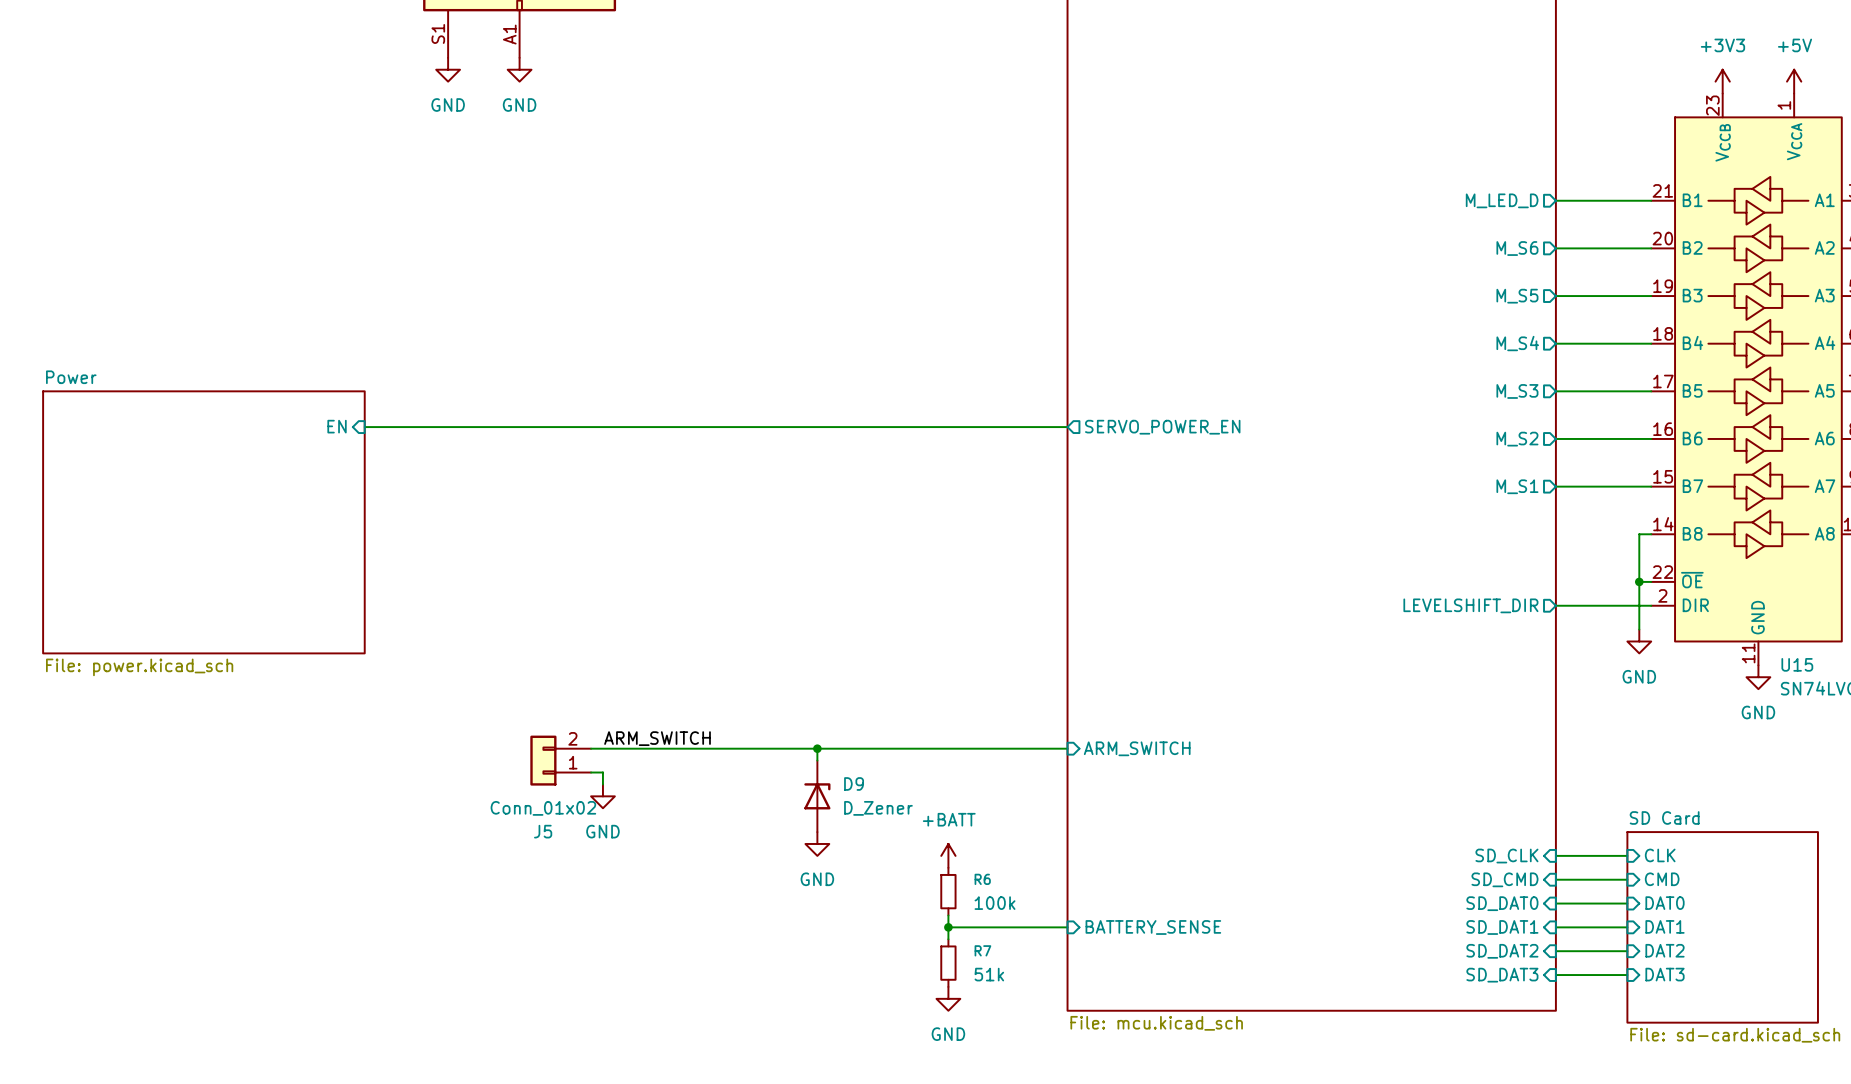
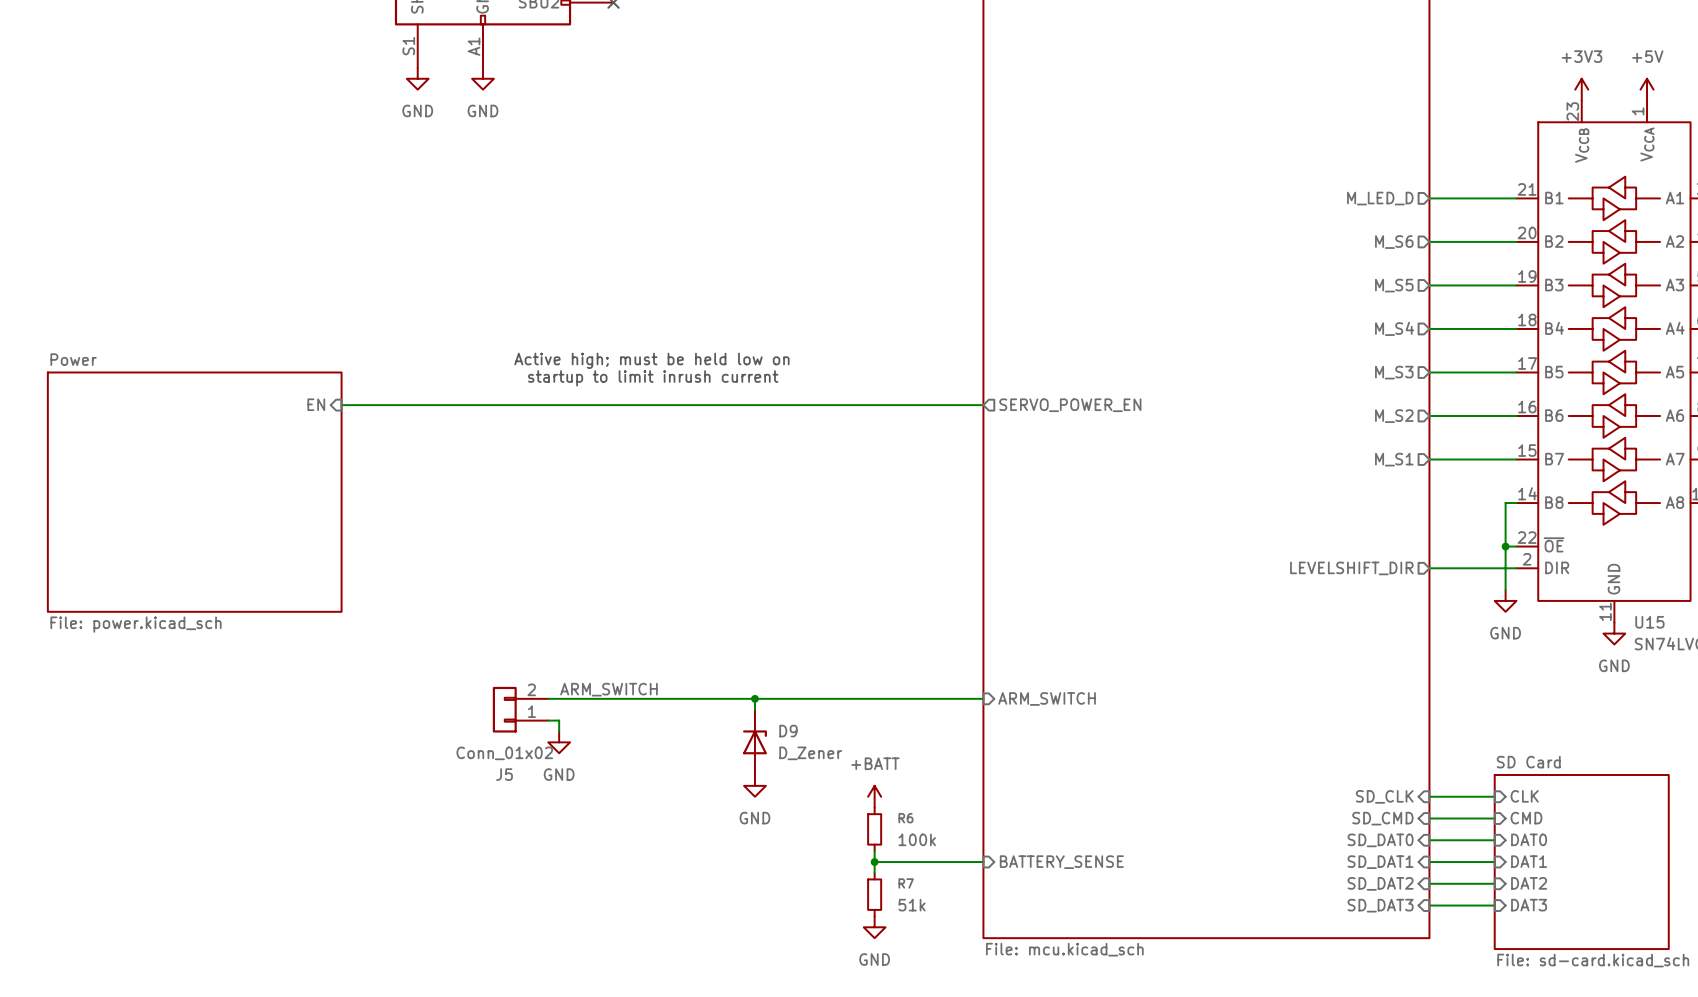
text: none -> Active high; must be held low on (651, 360)
text: none -> startup to limit inrush current (653, 378)

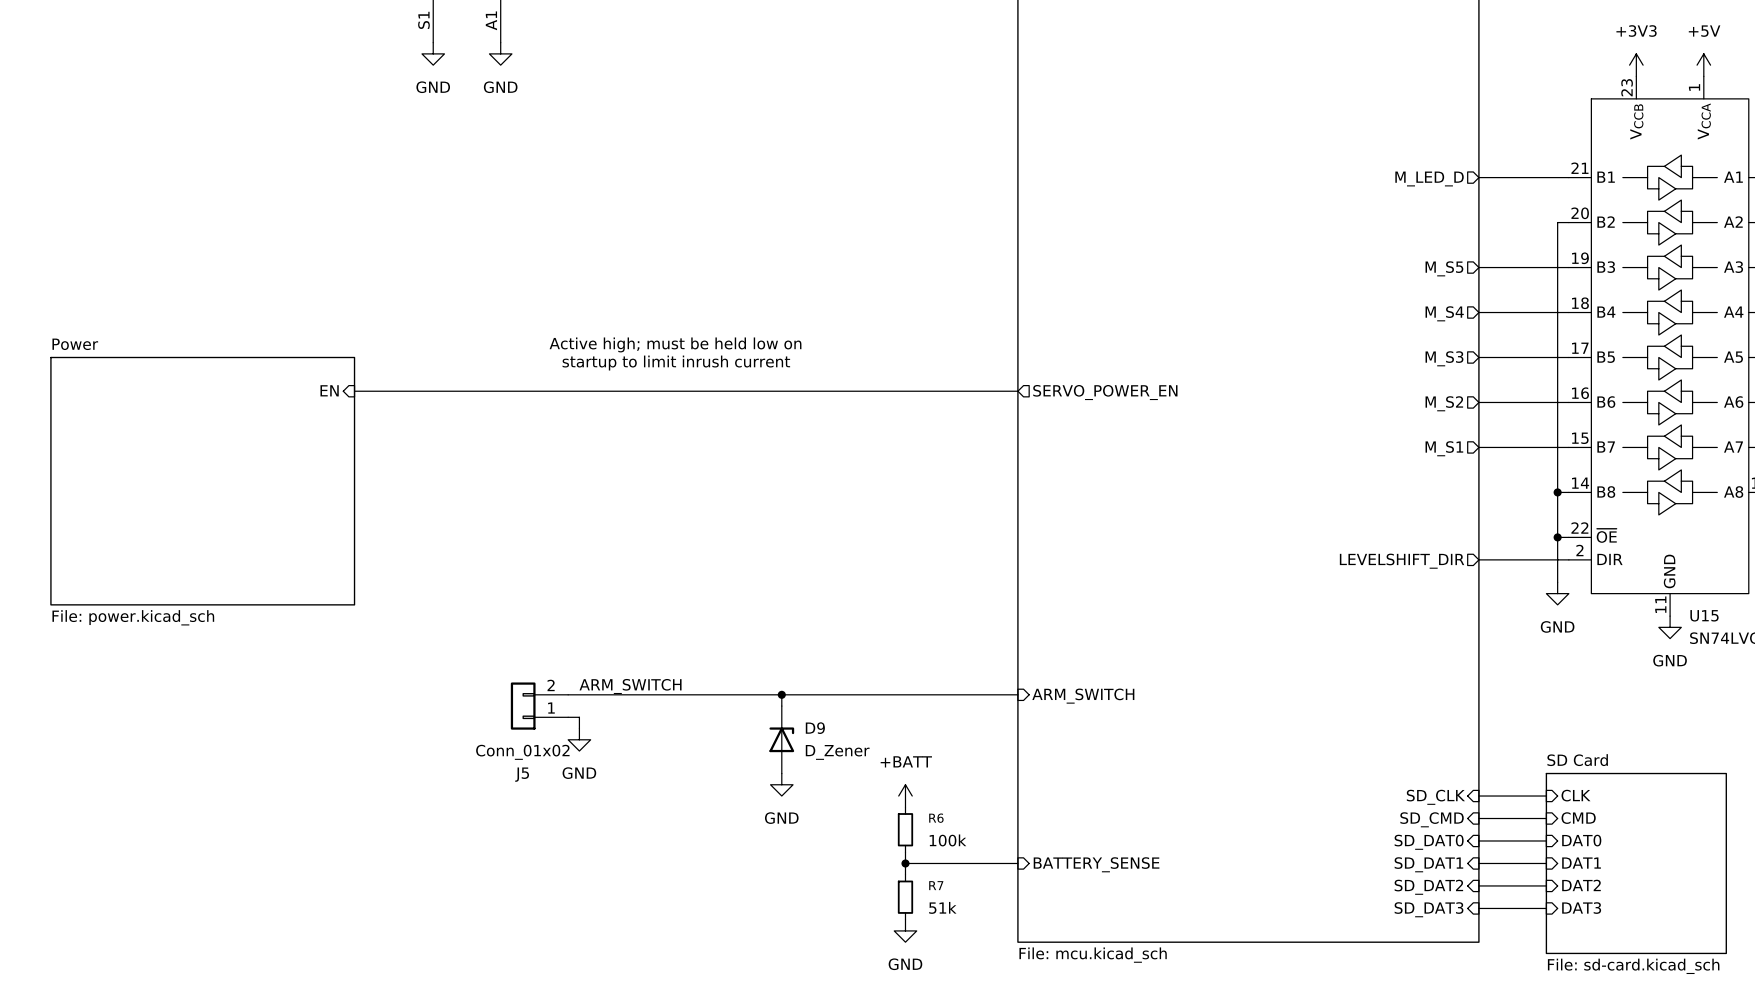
wire: (1429, 241) (1505, 241) -> (1557, 492) (1557, 222)
sheet pin: M_S6 (1394, 242) -> none
junction: none -> (1557, 492)

